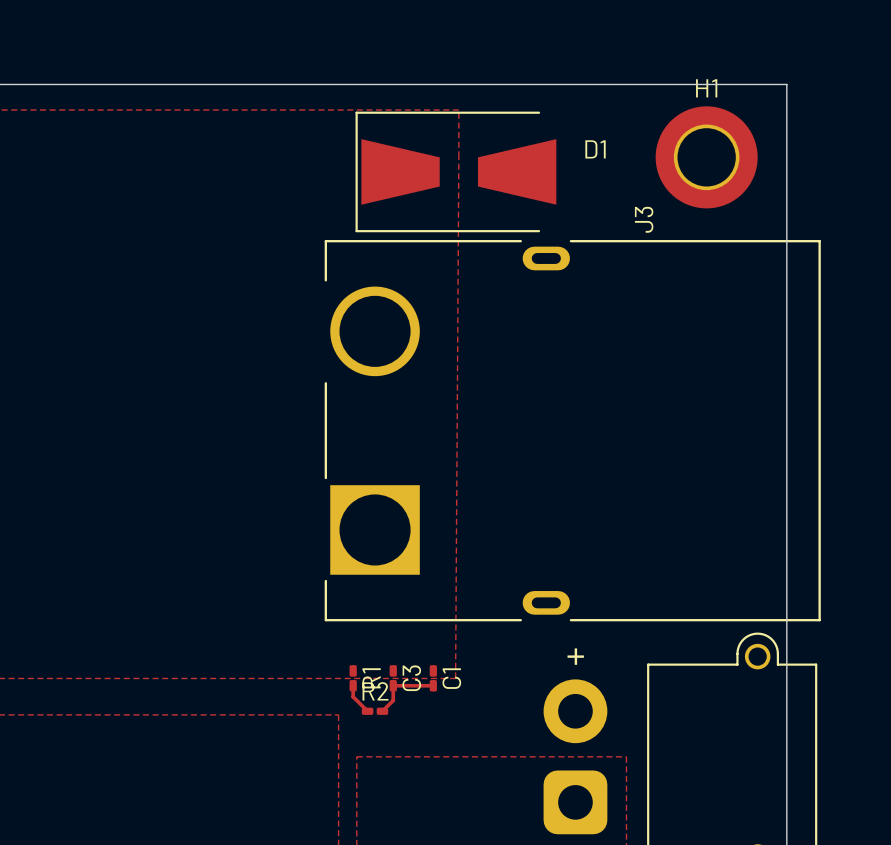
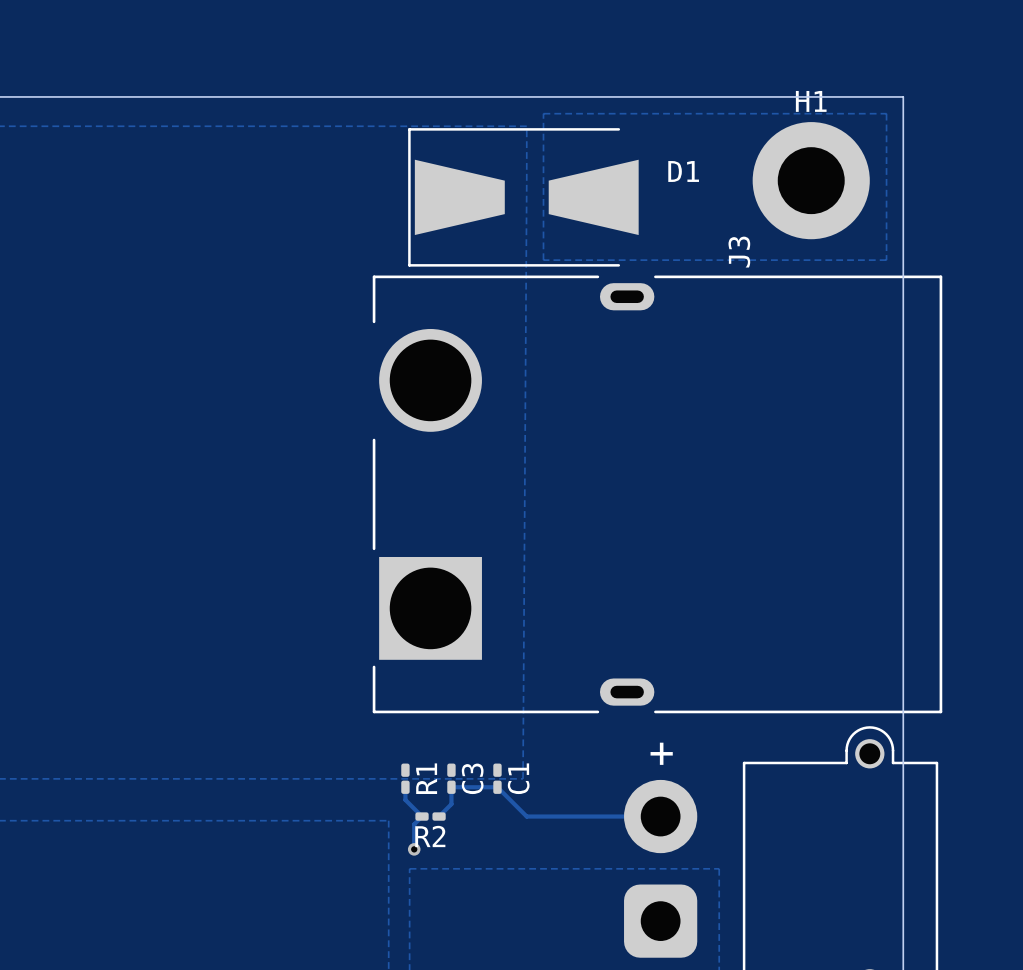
zone outline: none -> (543, 113) (886, 113) (886, 260) (543, 260) (543, 113)
track: none -> (497, 787) (526, 816) (660, 816)
R2 name position: R2 (375, 691) -> R2 (430, 836)
track: none -> (422, 816) (414, 824) (414, 849)
via: none -> (414, 849)

